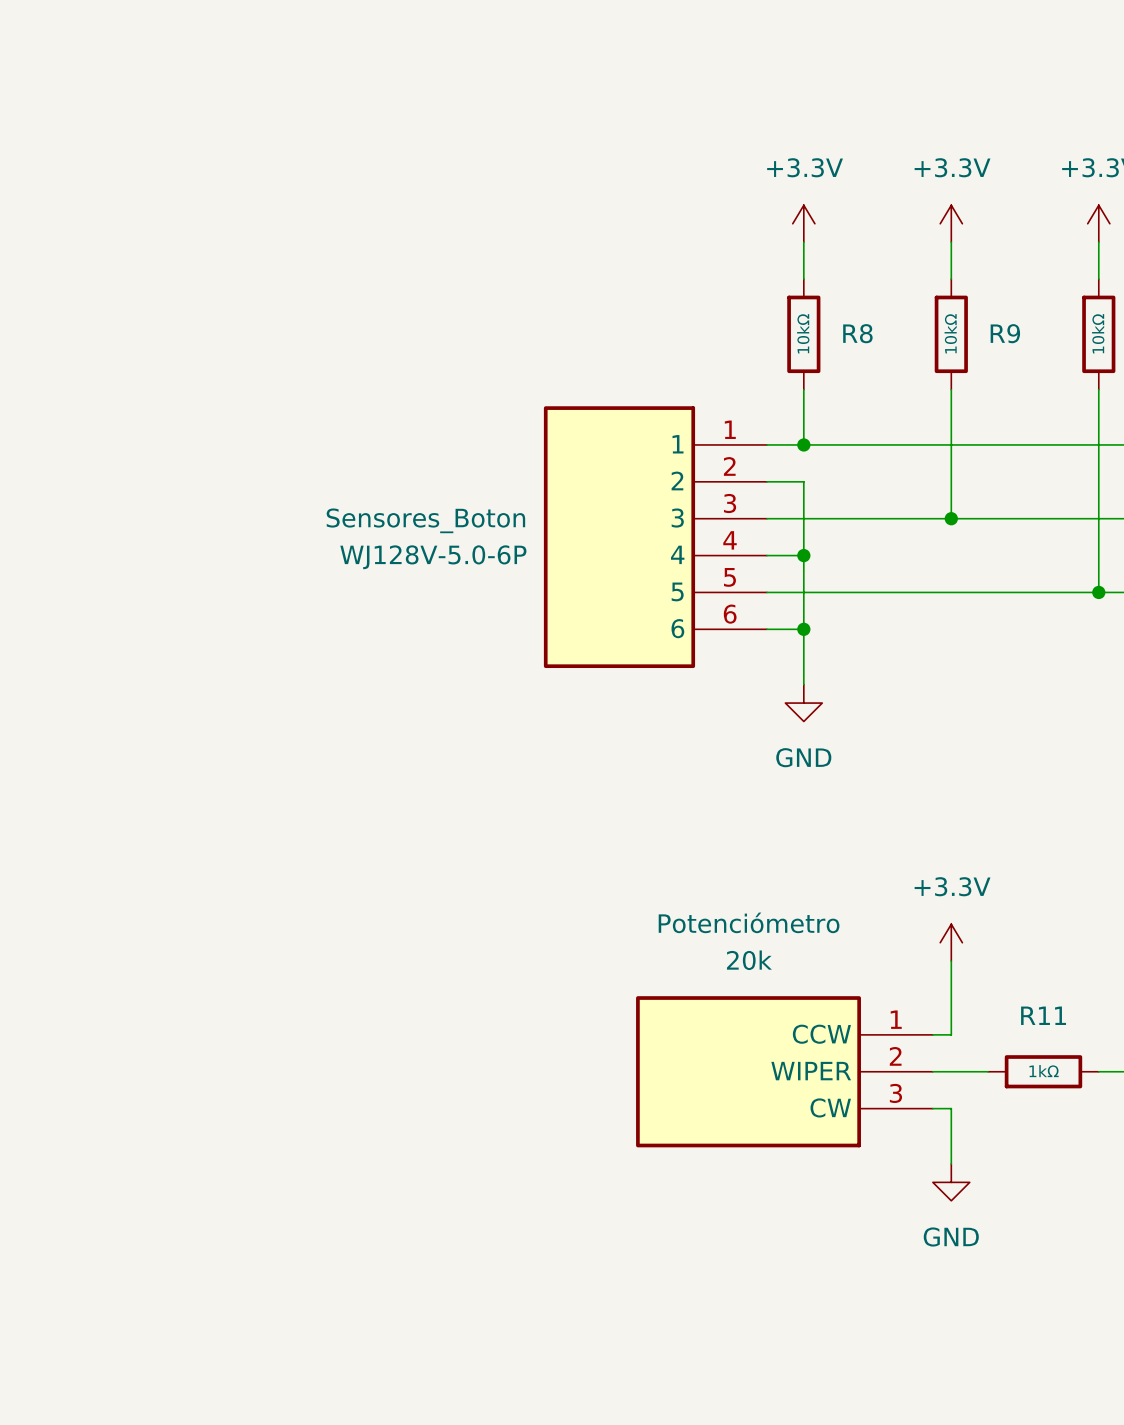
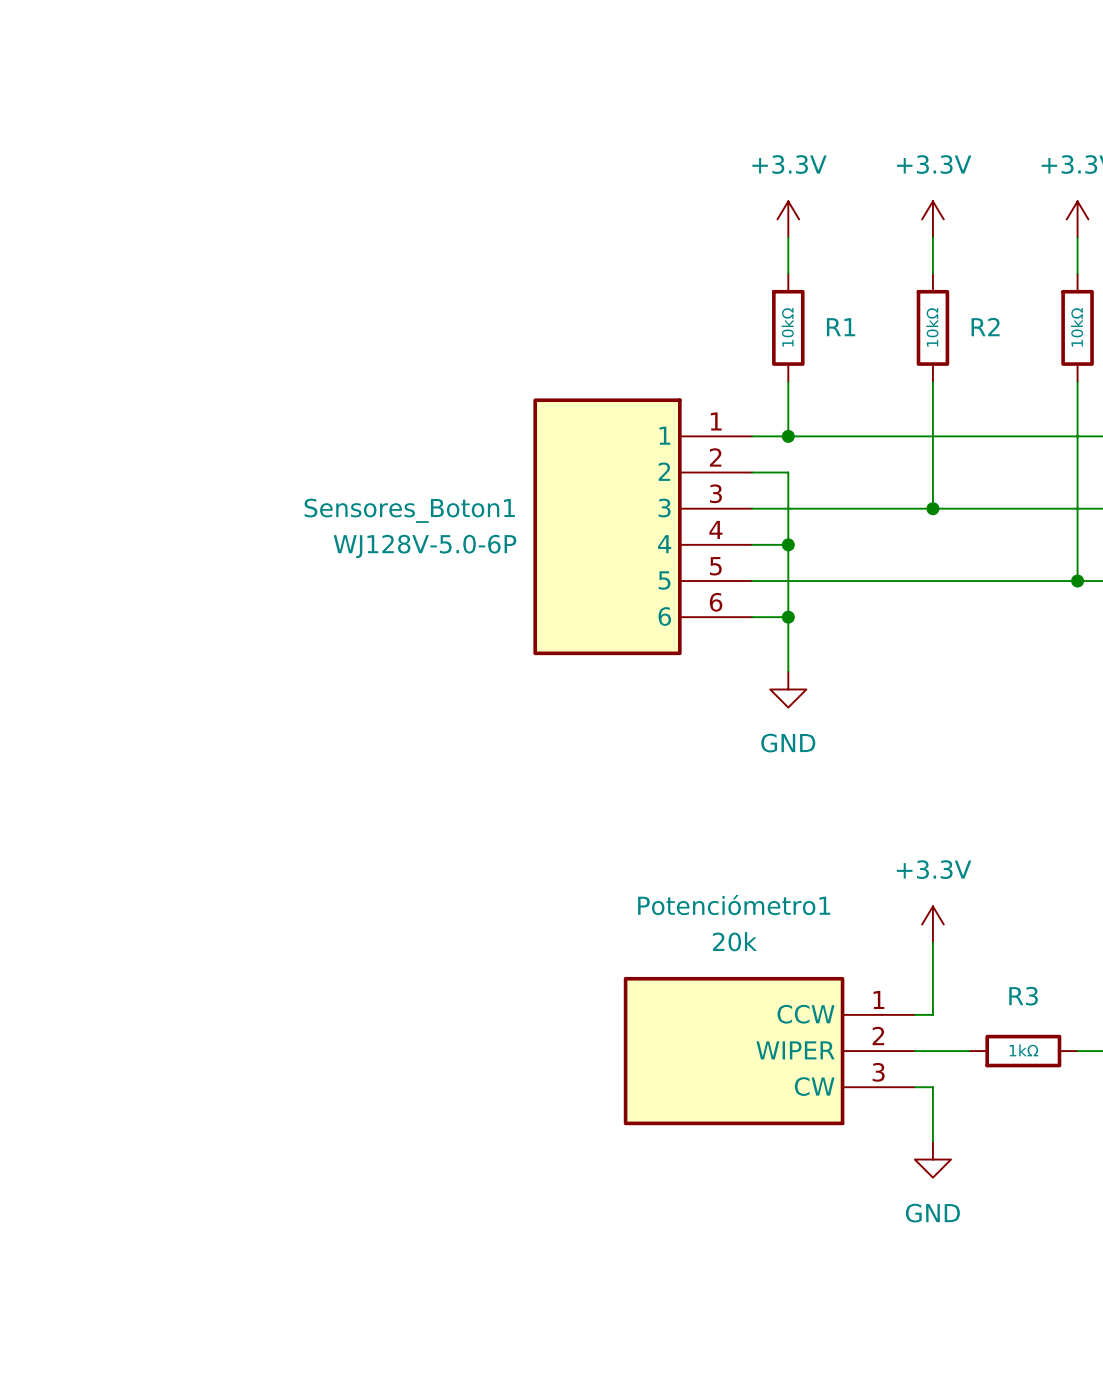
R8 name: R8 (857, 333) -> R1 (841, 327)
R9 name: R9 (1005, 333) -> R2 (985, 327)
Sensores_Boton name: Sensores_Boton (425, 520) -> Sensores_Boton1 (409, 510)
Potenciómetro name: Potenciómetro (749, 922) -> Potenciómetro1 (734, 905)
R11 name: R11 (1043, 1015) -> R3 (1023, 996)

